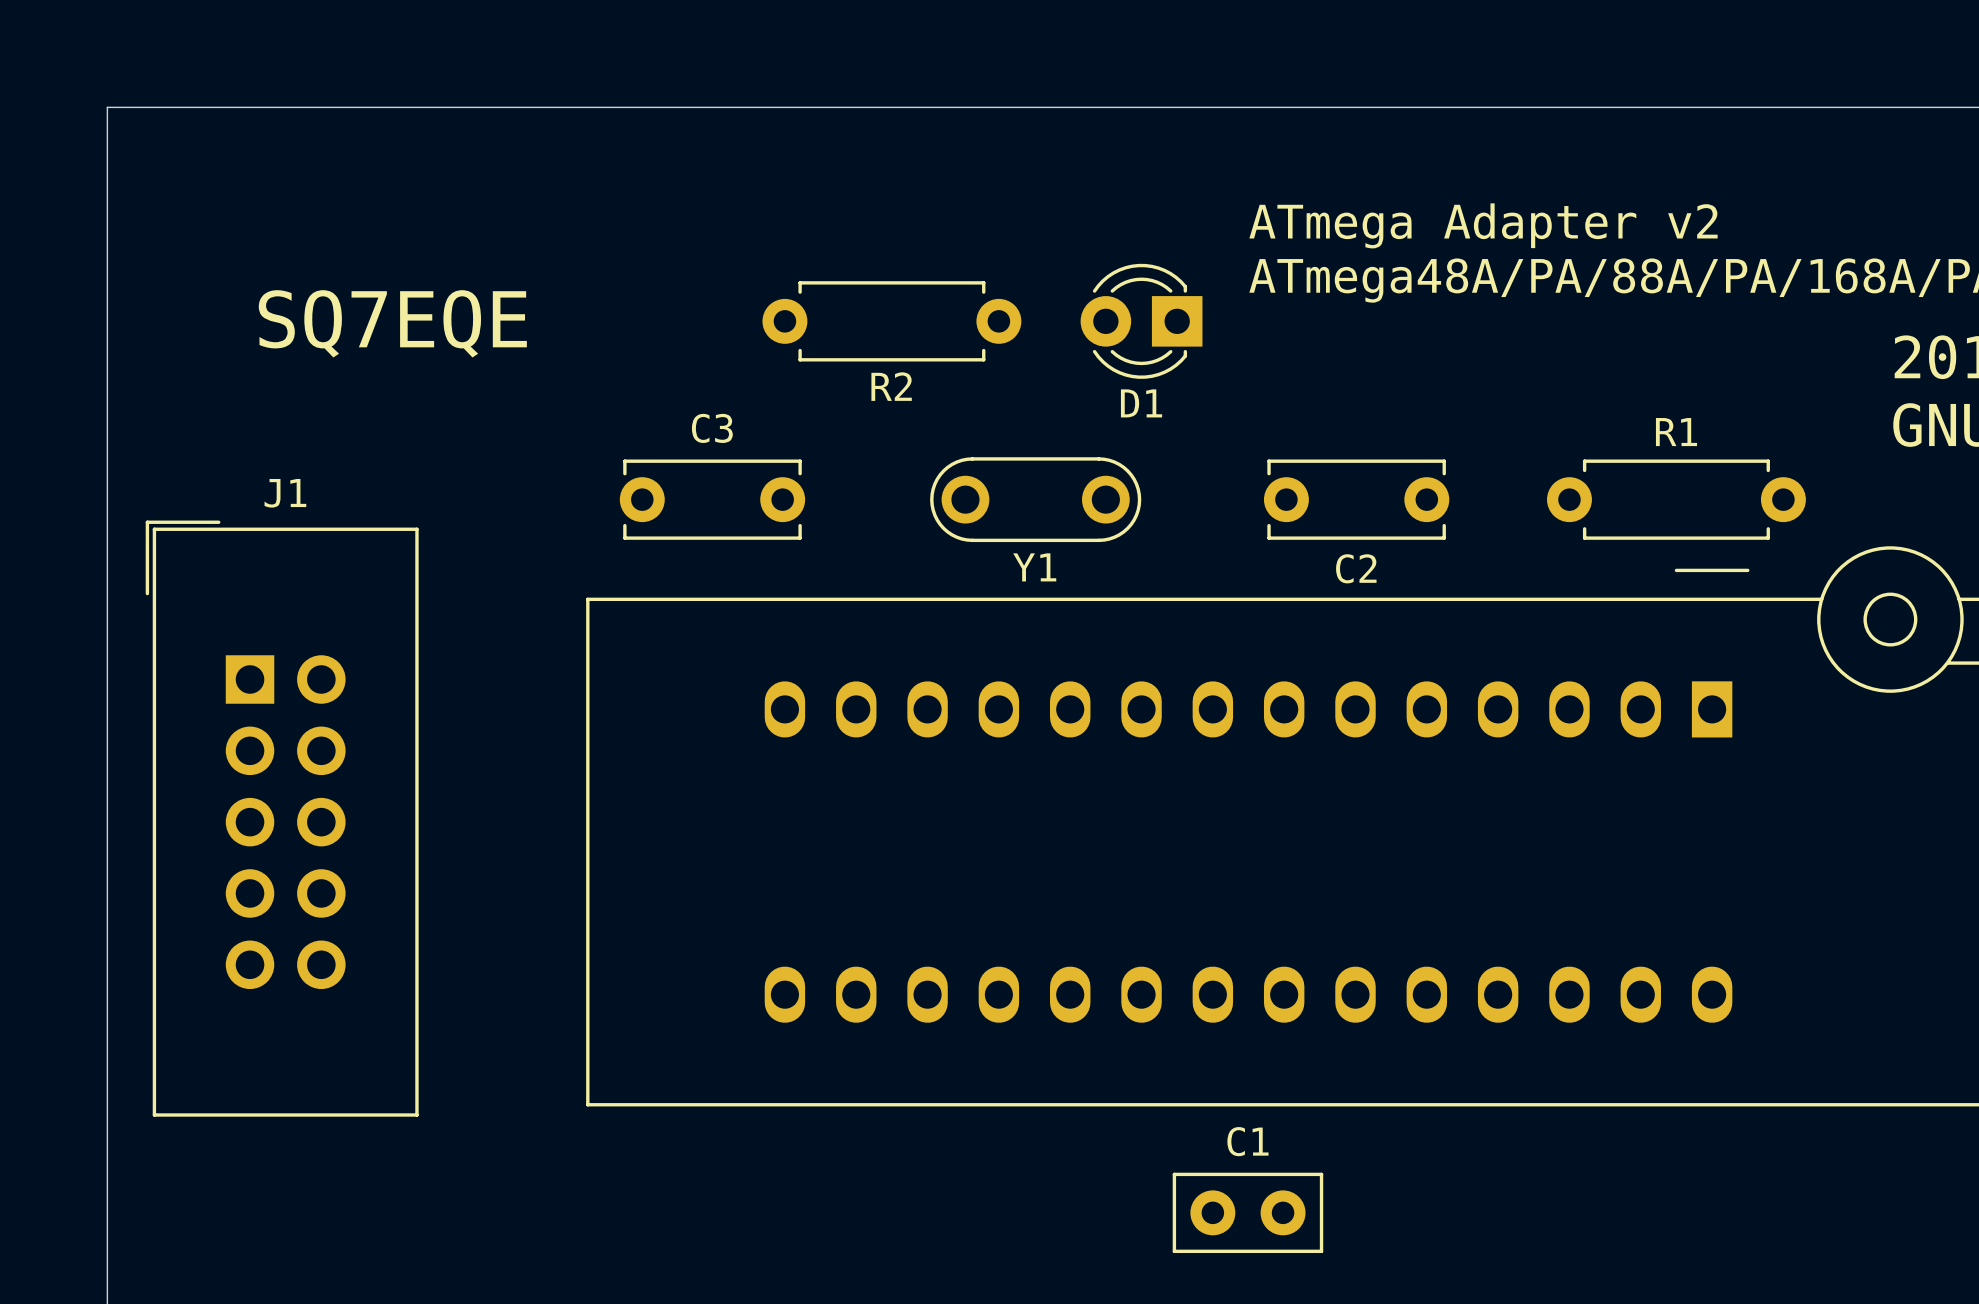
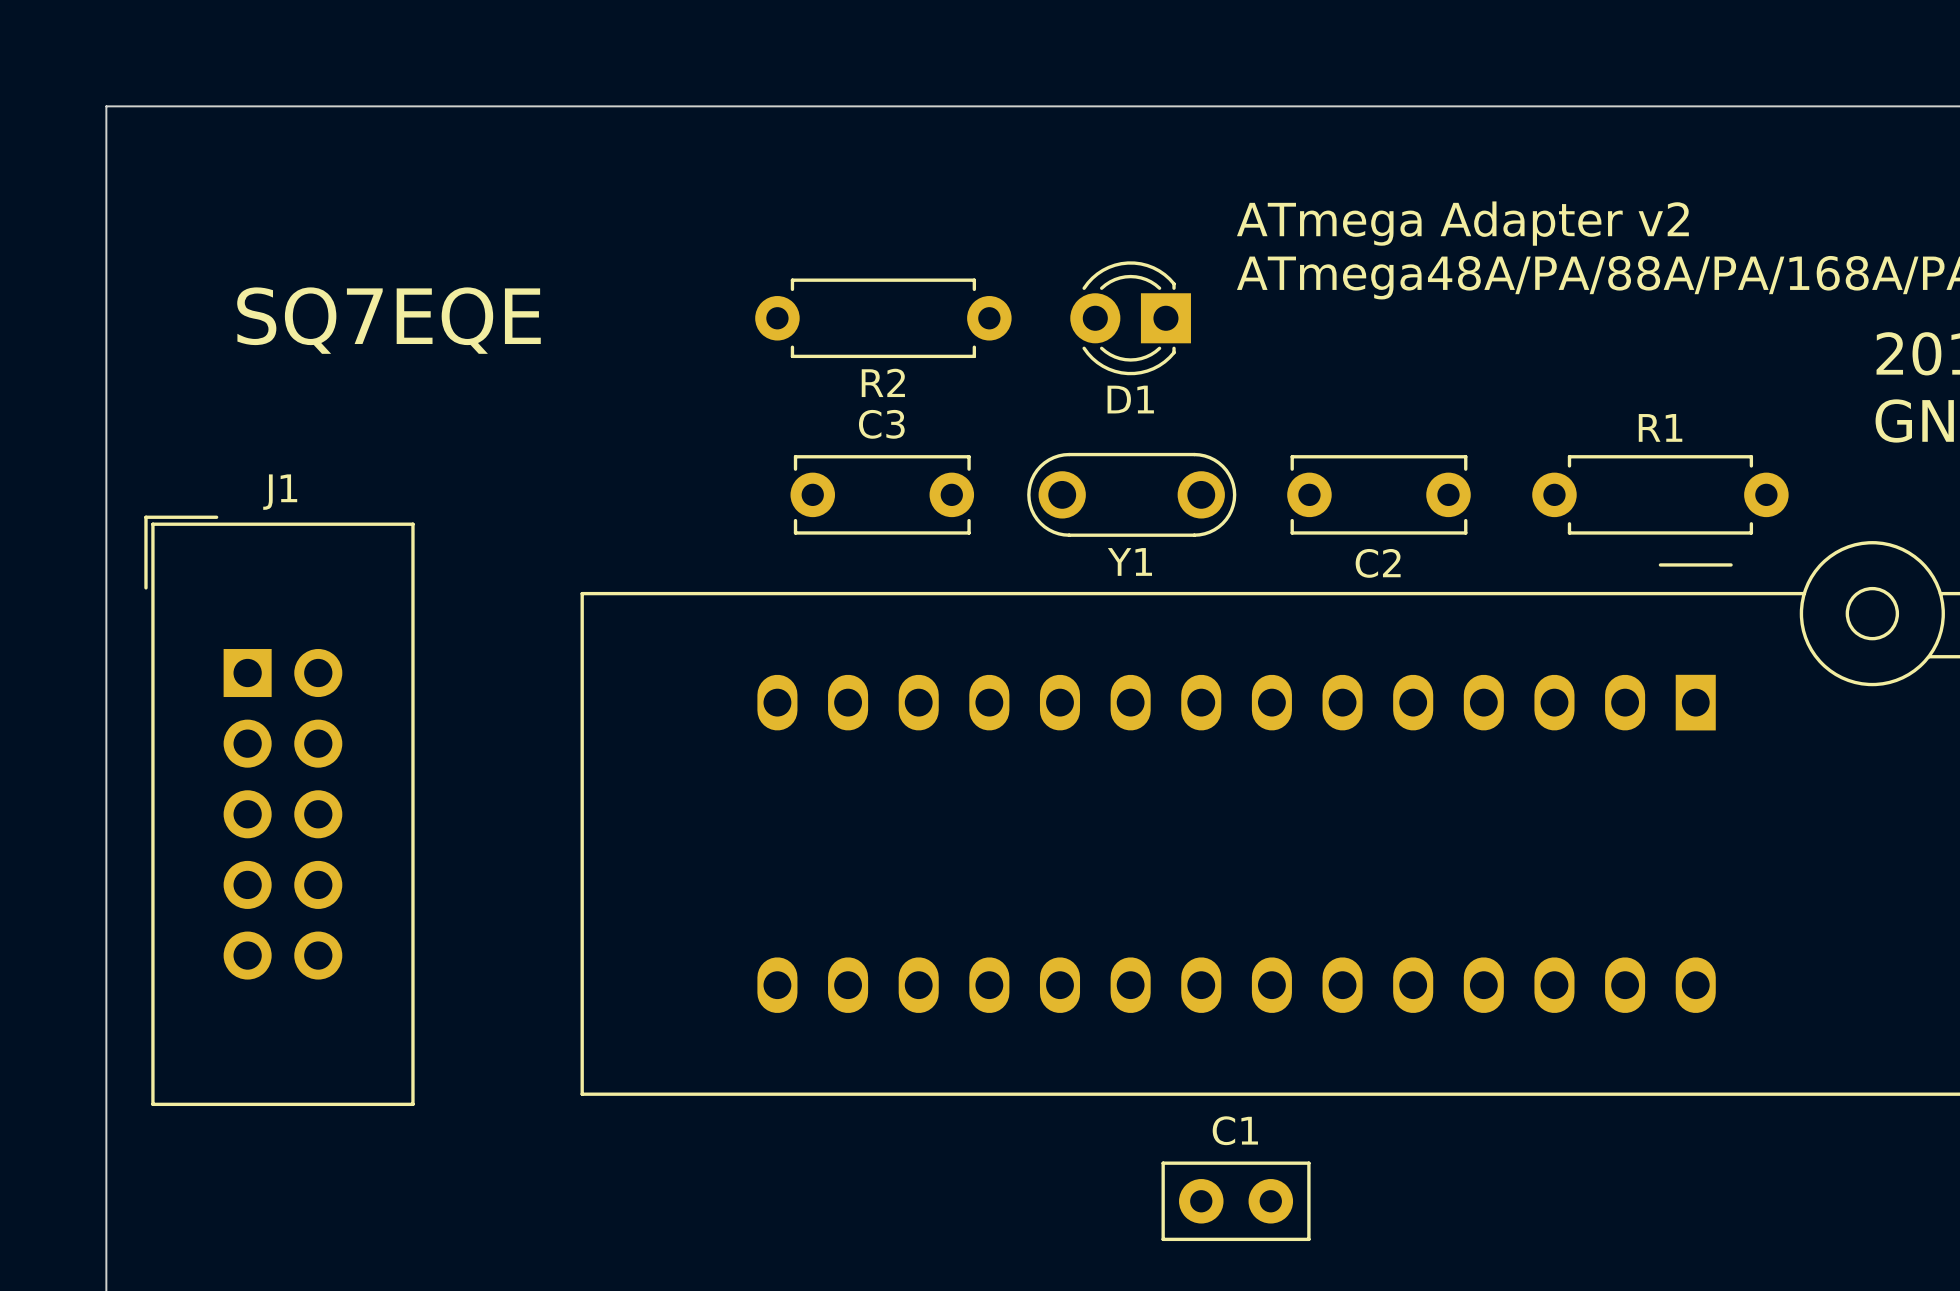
C3 position: (712, 499) -> (882, 494)
Y1 position: (1035, 499) -> (1131, 494)
C2 position: (1356, 499) -> (1378, 494)

